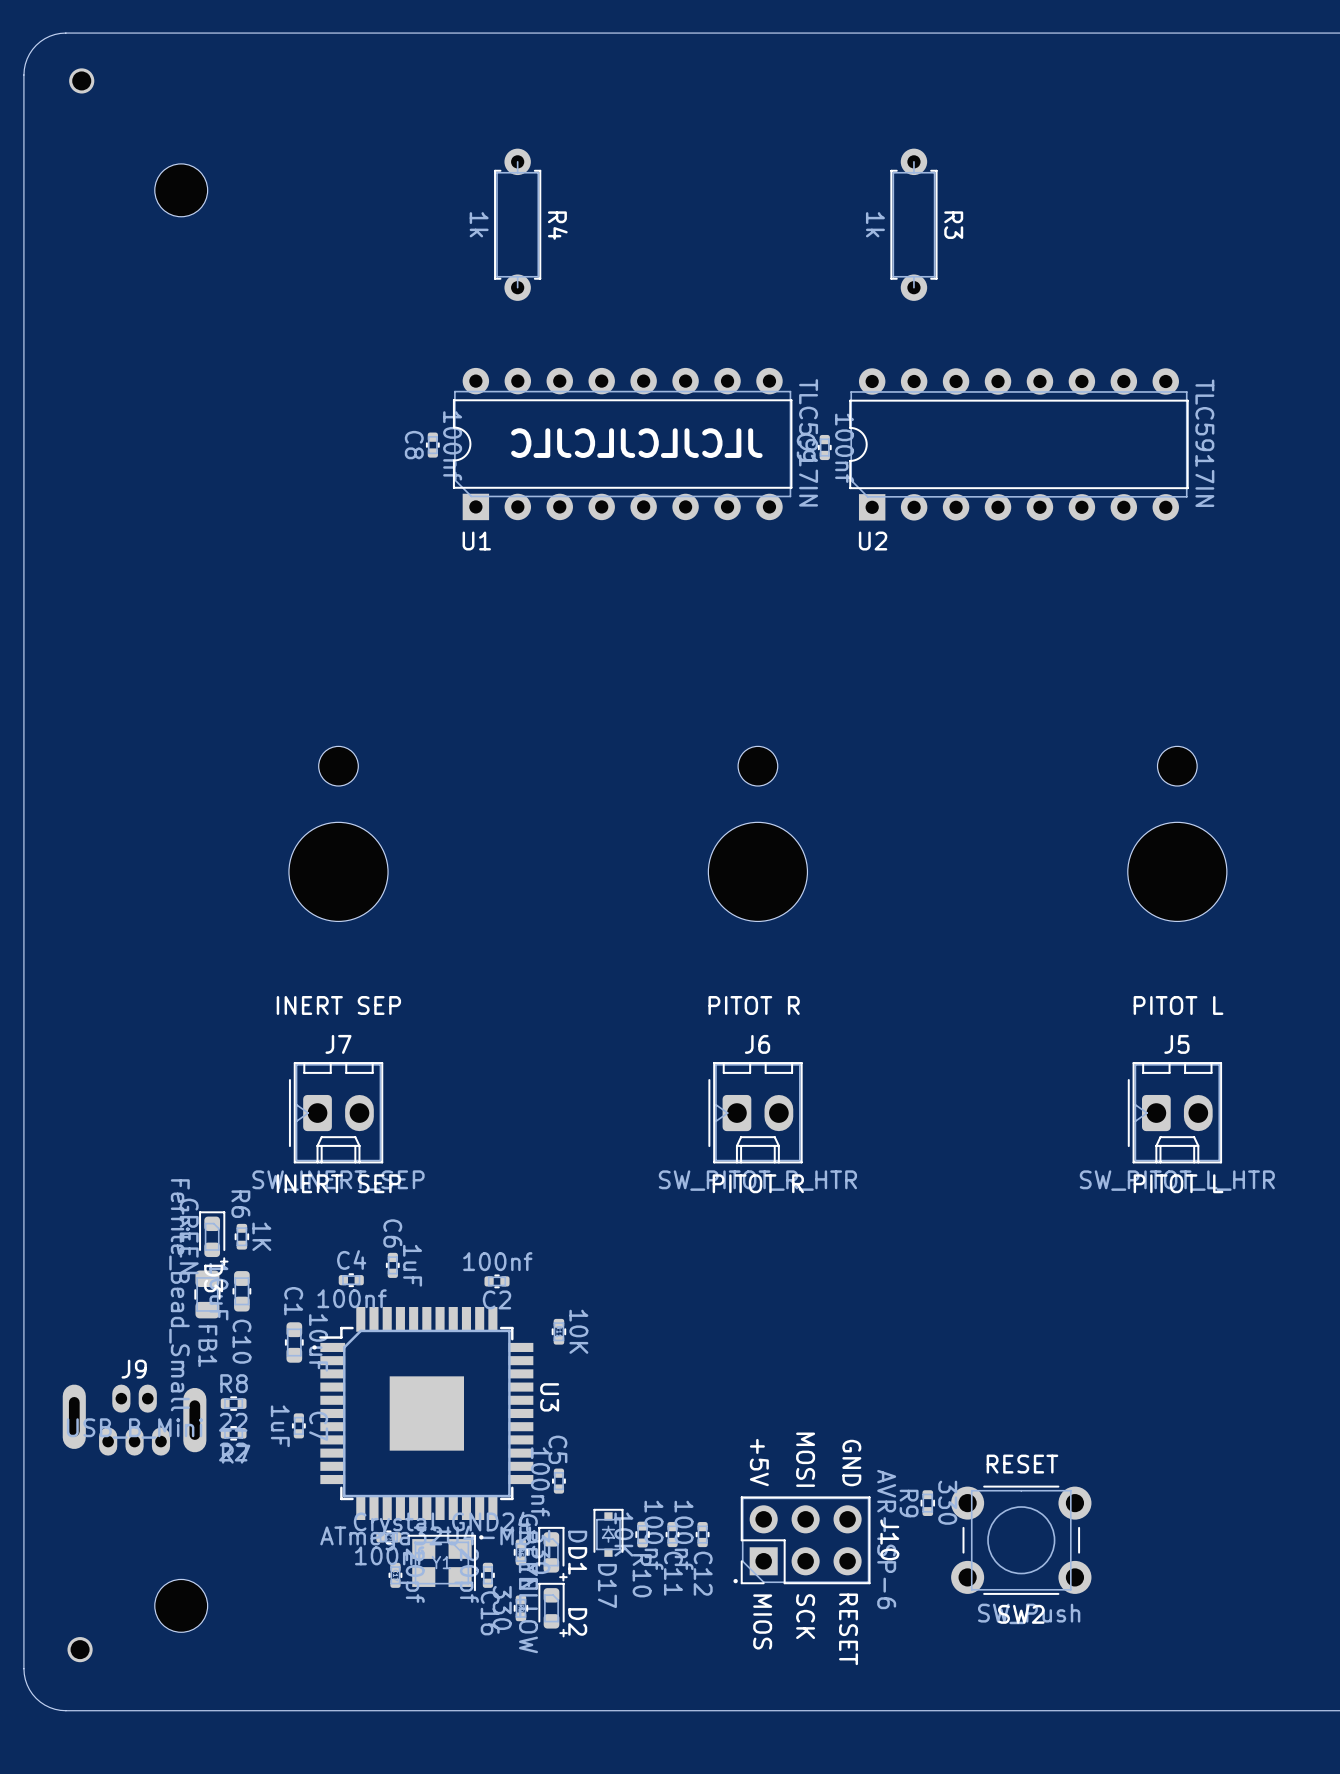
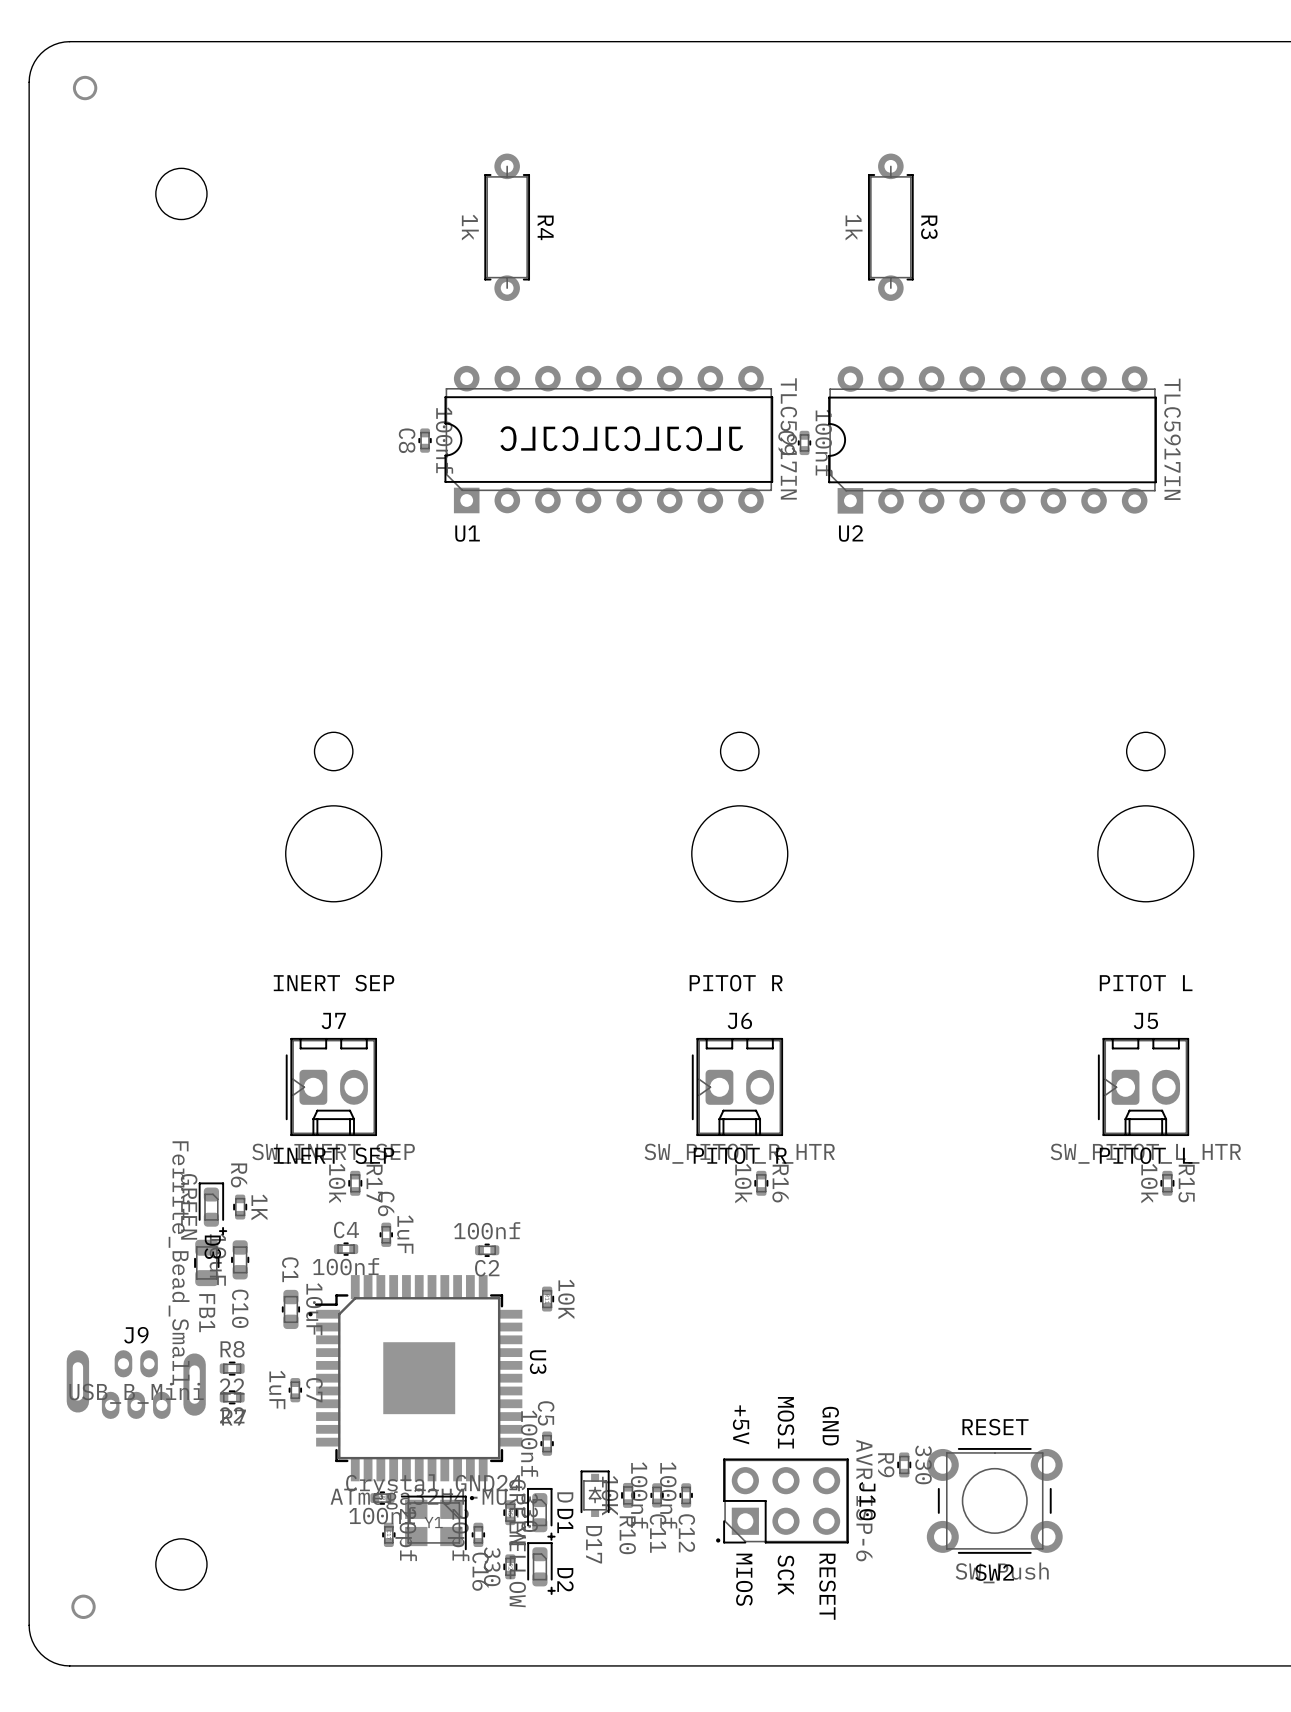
R17: none -> 10k (355, 1183)
R16: none -> 10k (761, 1183)
R15: none -> 10k (1167, 1183)

